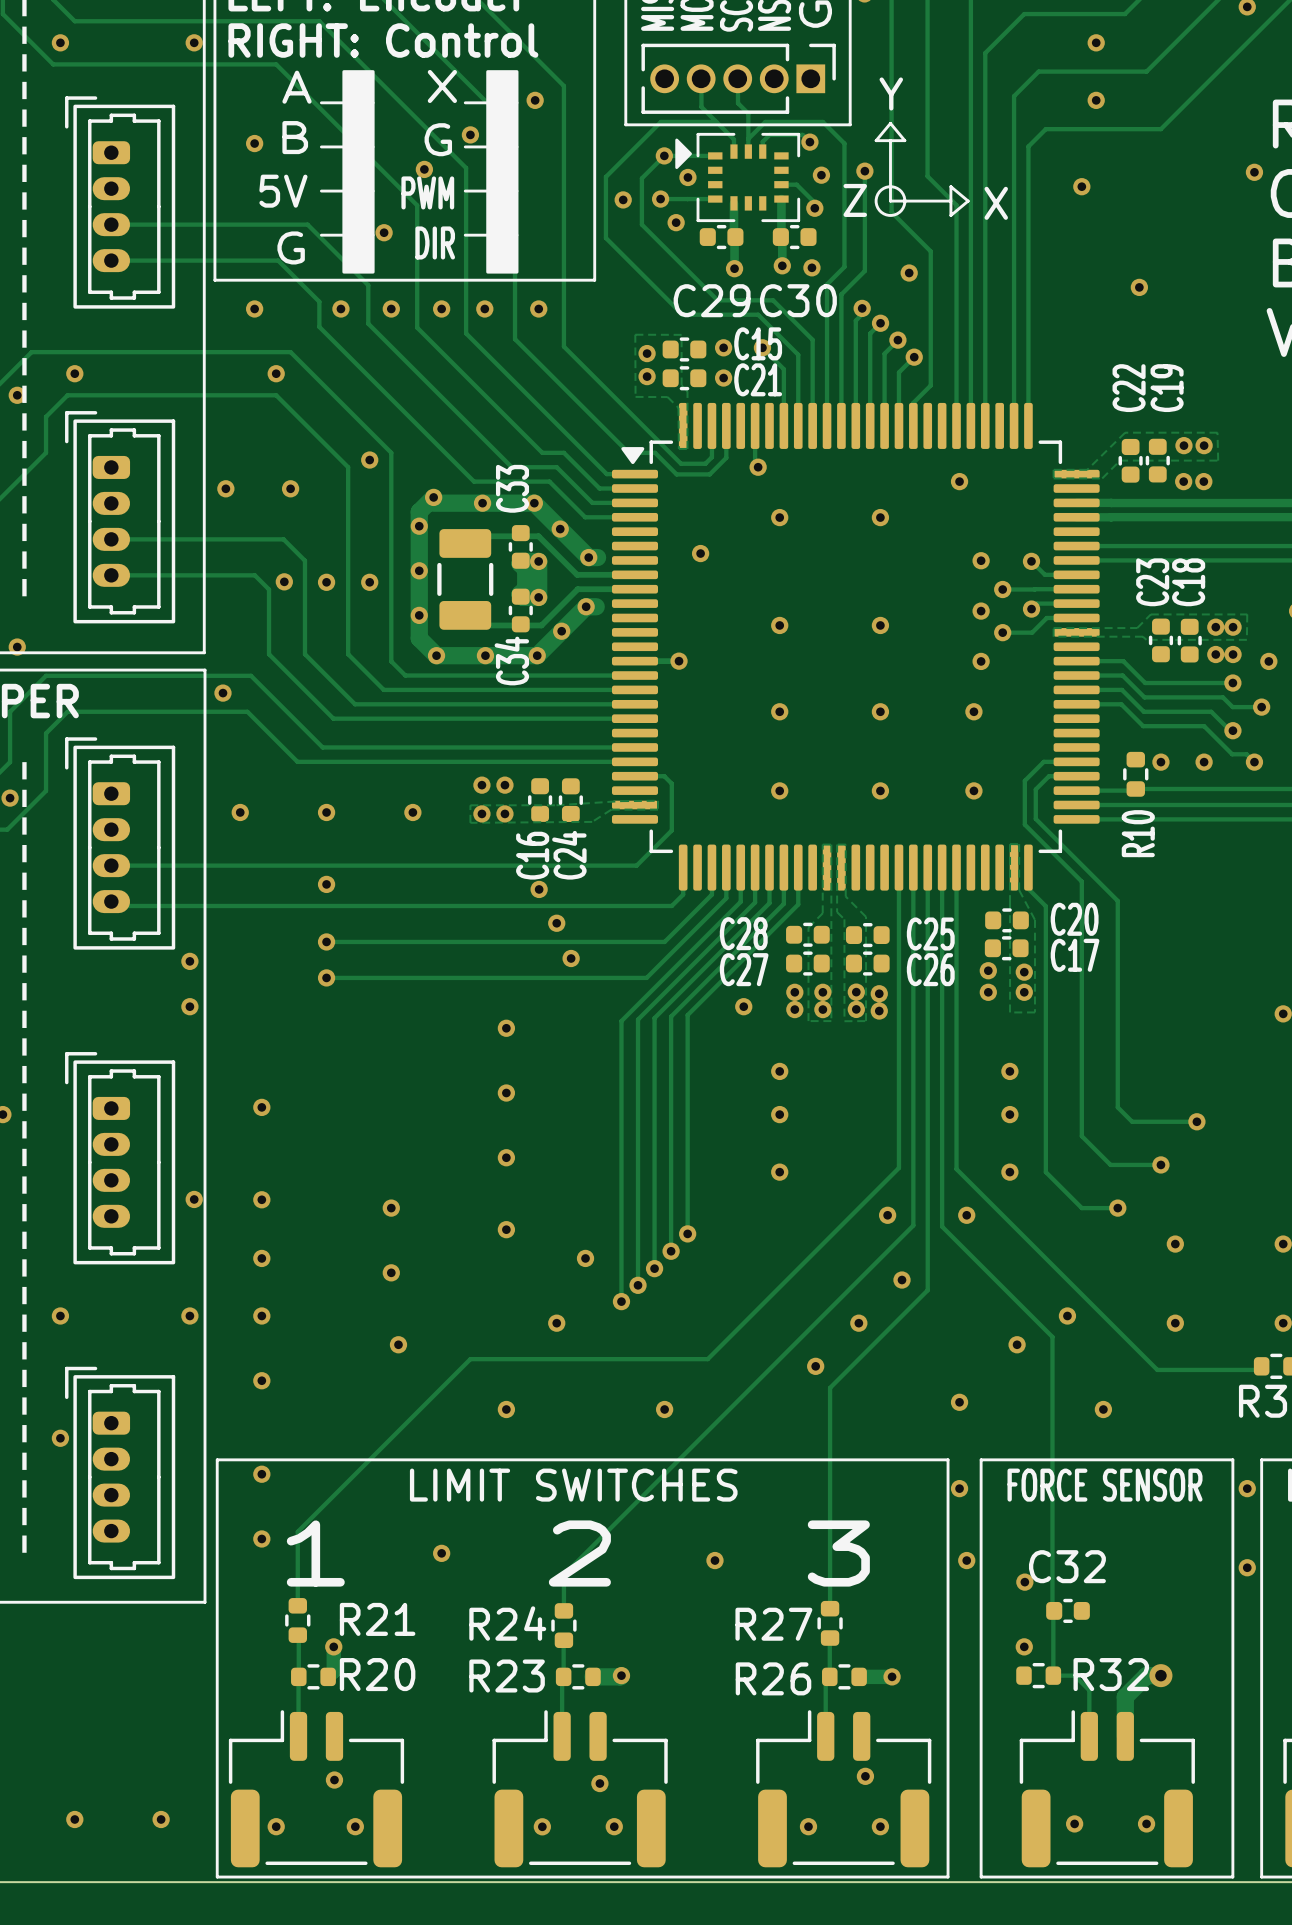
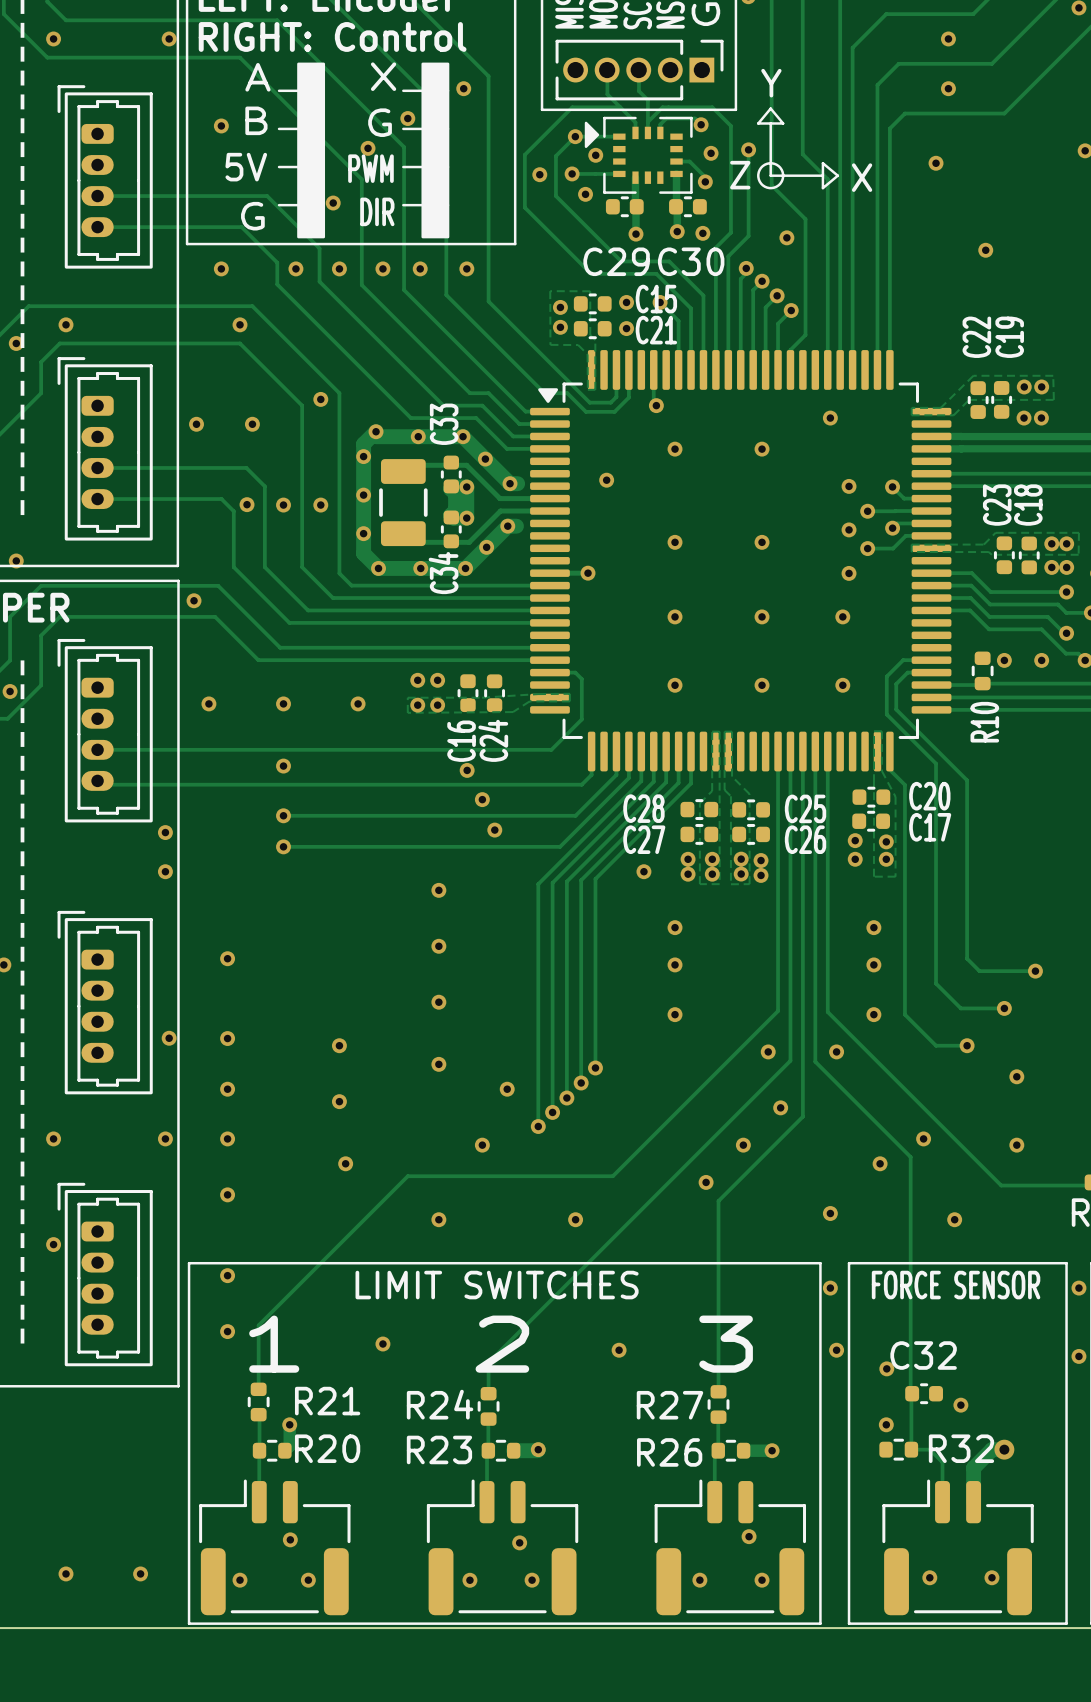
via: none -> (960, 1405)

